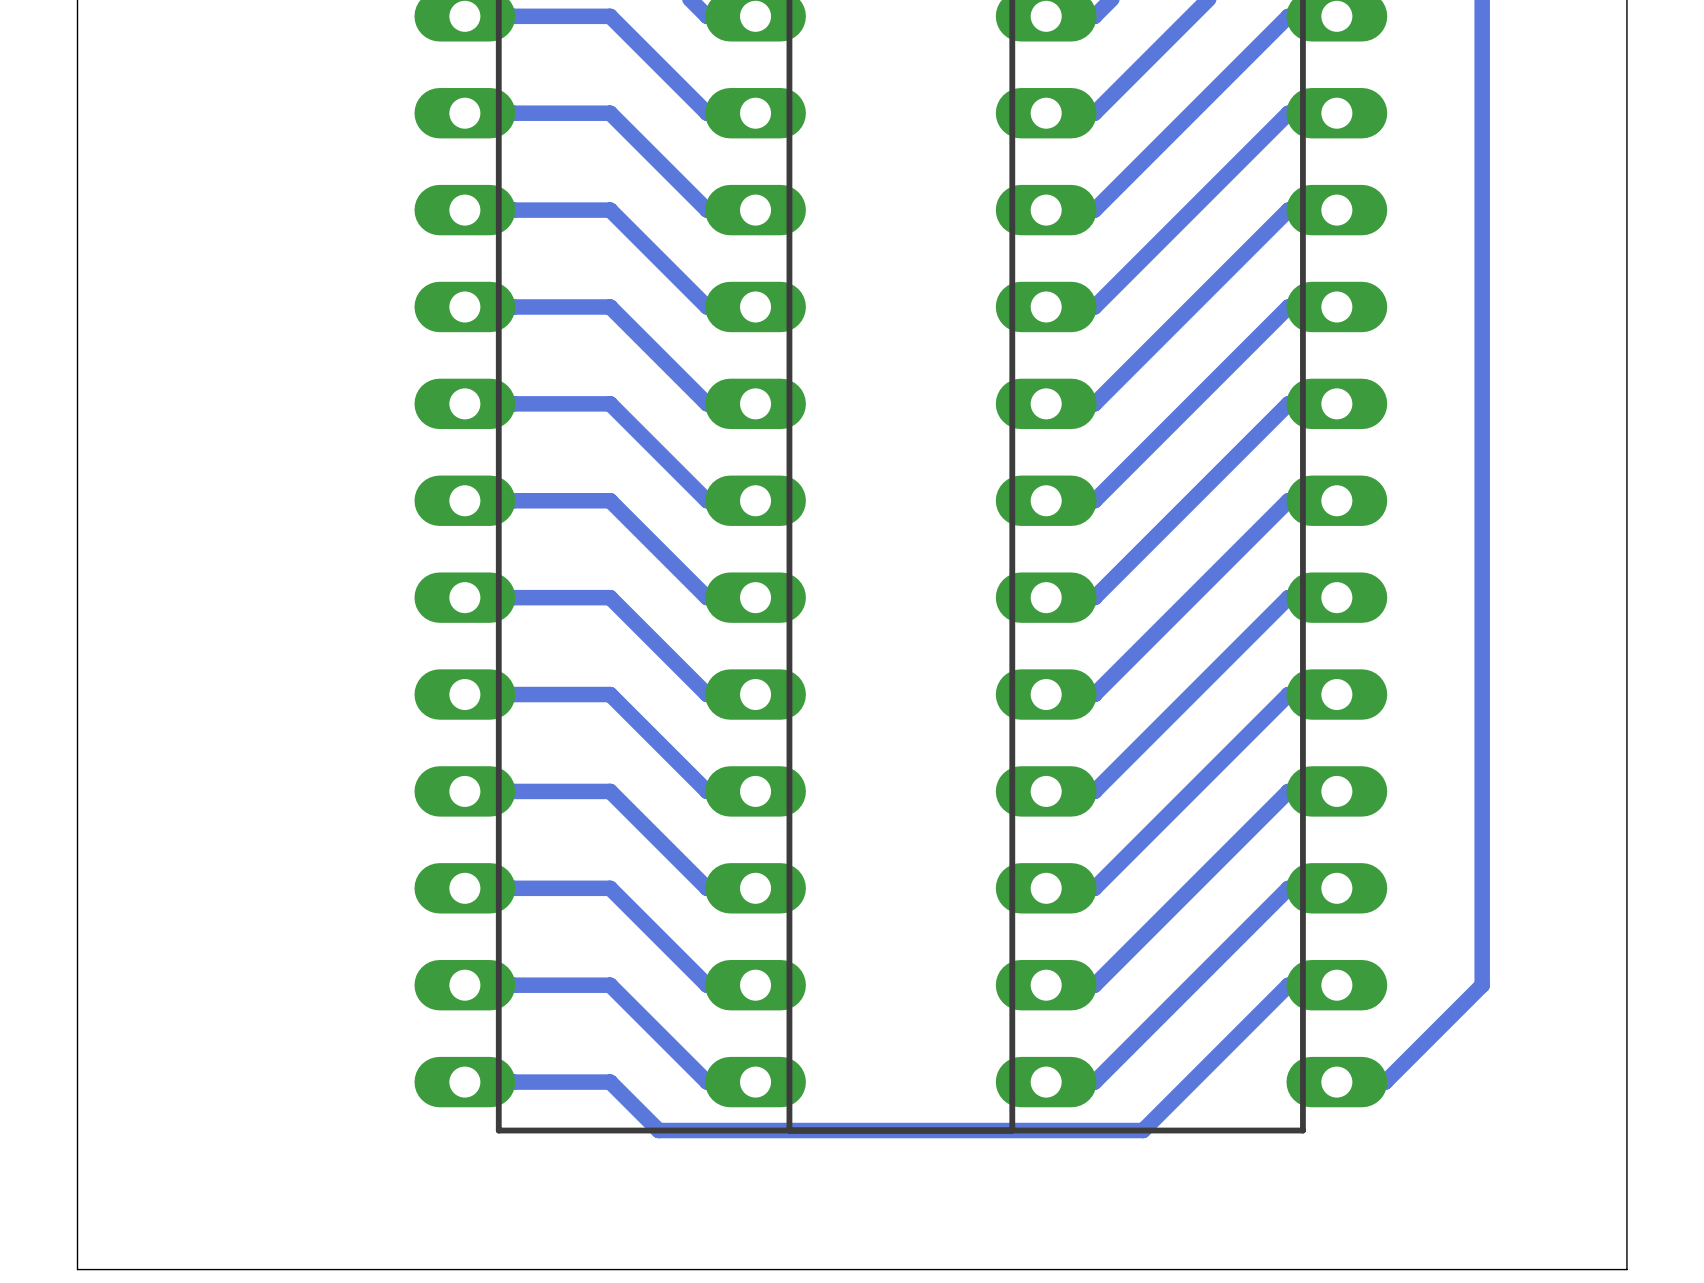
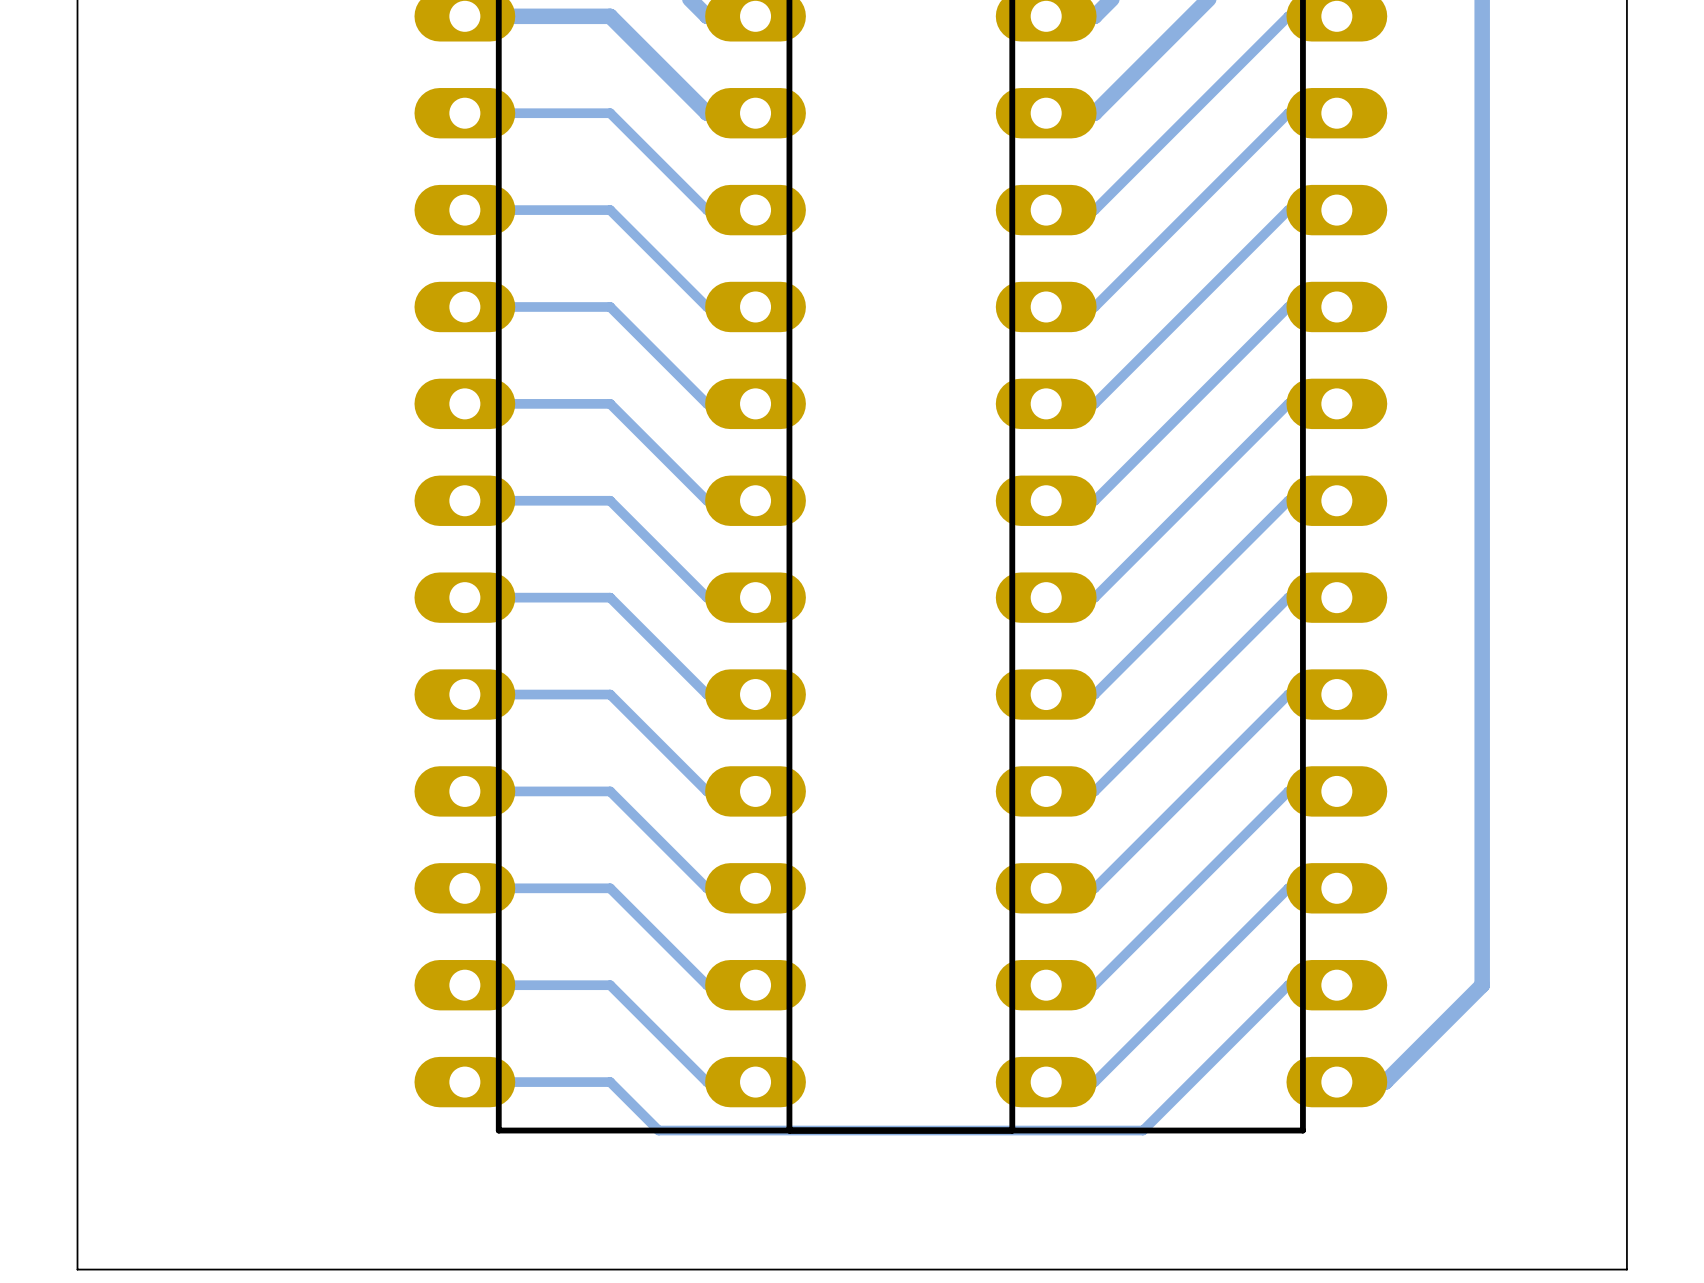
bottom track width: thick (1336, 16) (1288, 16) (1094, 210) (1046, 210) -> thin (1336, 16) (1288, 16) (1094, 210) (1046, 210)
bottom track width: thick (464, 113) (610, 113) (707, 210) (755, 210) -> thin (464, 113) (610, 113) (707, 210) (755, 210)
bottom track width: thick (1336, 113) (1288, 113) (1094, 306) (1046, 306) -> thin (1336, 113) (1288, 113) (1094, 306) (1046, 306)
bottom track width: thick (464, 210) (610, 210) (707, 306) (755, 306) -> thin (464, 210) (610, 210) (707, 306) (755, 306)
bottom track width: thick (1336, 210) (1288, 210) (1094, 403) (1046, 403) -> thin (1336, 210) (1288, 210) (1094, 403) (1046, 403)
bottom track width: thick (464, 306) (610, 306) (707, 403) (755, 403) -> thin (464, 306) (610, 306) (707, 403) (755, 403)
bottom track width: thick (1336, 306) (1288, 306) (1094, 500) (1046, 500) -> thin (1336, 306) (1288, 306) (1094, 500) (1046, 500)
bottom track width: thick (464, 403) (610, 403) (707, 500) (755, 500) -> thin (464, 403) (610, 403) (707, 500) (755, 500)
bottom track width: thick (1336, 403) (1288, 403) (1094, 597) (1046, 597) -> thin (1336, 403) (1288, 403) (1094, 597) (1046, 597)
bottom track width: thick (464, 500) (610, 500) (707, 597) (755, 597) -> thin (464, 500) (610, 500) (707, 597) (755, 597)
bottom track width: thick (1336, 500) (1288, 500) (1094, 694) (1046, 694) -> thin (1336, 500) (1288, 500) (1094, 694) (1046, 694)
bottom track width: thick (464, 597) (610, 597) (707, 694) (755, 694) -> thin (464, 597) (610, 597) (707, 694) (755, 694)
bottom track width: thick (1336, 597) (1288, 597) (1094, 791) (1046, 791) -> thin (1336, 597) (1288, 597) (1094, 791) (1046, 791)
bottom track width: thick (464, 694) (610, 694) (707, 791) (755, 791) -> thin (464, 694) (610, 694) (707, 791) (755, 791)
bottom track width: thick (1336, 694) (1288, 694) (1094, 888) (1046, 888) -> thin (1336, 694) (1288, 694) (1094, 888) (1046, 888)
bottom track width: thick (464, 791) (610, 791) (707, 888) (755, 888) -> thin (464, 791) (610, 791) (707, 888) (755, 888)
bottom track width: thick (1336, 791) (1288, 791) (1094, 985) (1046, 985) -> thin (1336, 791) (1288, 791) (1094, 985) (1046, 985)
bottom track width: thick (464, 888) (610, 888) (707, 985) (755, 985) -> thin (464, 888) (610, 888) (707, 985) (755, 985)
bottom track width: thick (1336, 888) (1288, 888) (1094, 1082) (1046, 1082) -> thin (1336, 888) (1288, 888) (1094, 1082) (1046, 1082)
bottom track width: thick (464, 985) (610, 985) (707, 1082) (755, 1082) -> thin (464, 985) (610, 985) (707, 1082) (755, 1082)
bottom track width: thick (1336, 985) (1288, 985) (1143, 1130) (658, 1130) (610, 1082) (464, 1082) -> thin (1336, 985) (1288, 985) (1143, 1130) (658, 1130) (610, 1082) (464, 1082)

